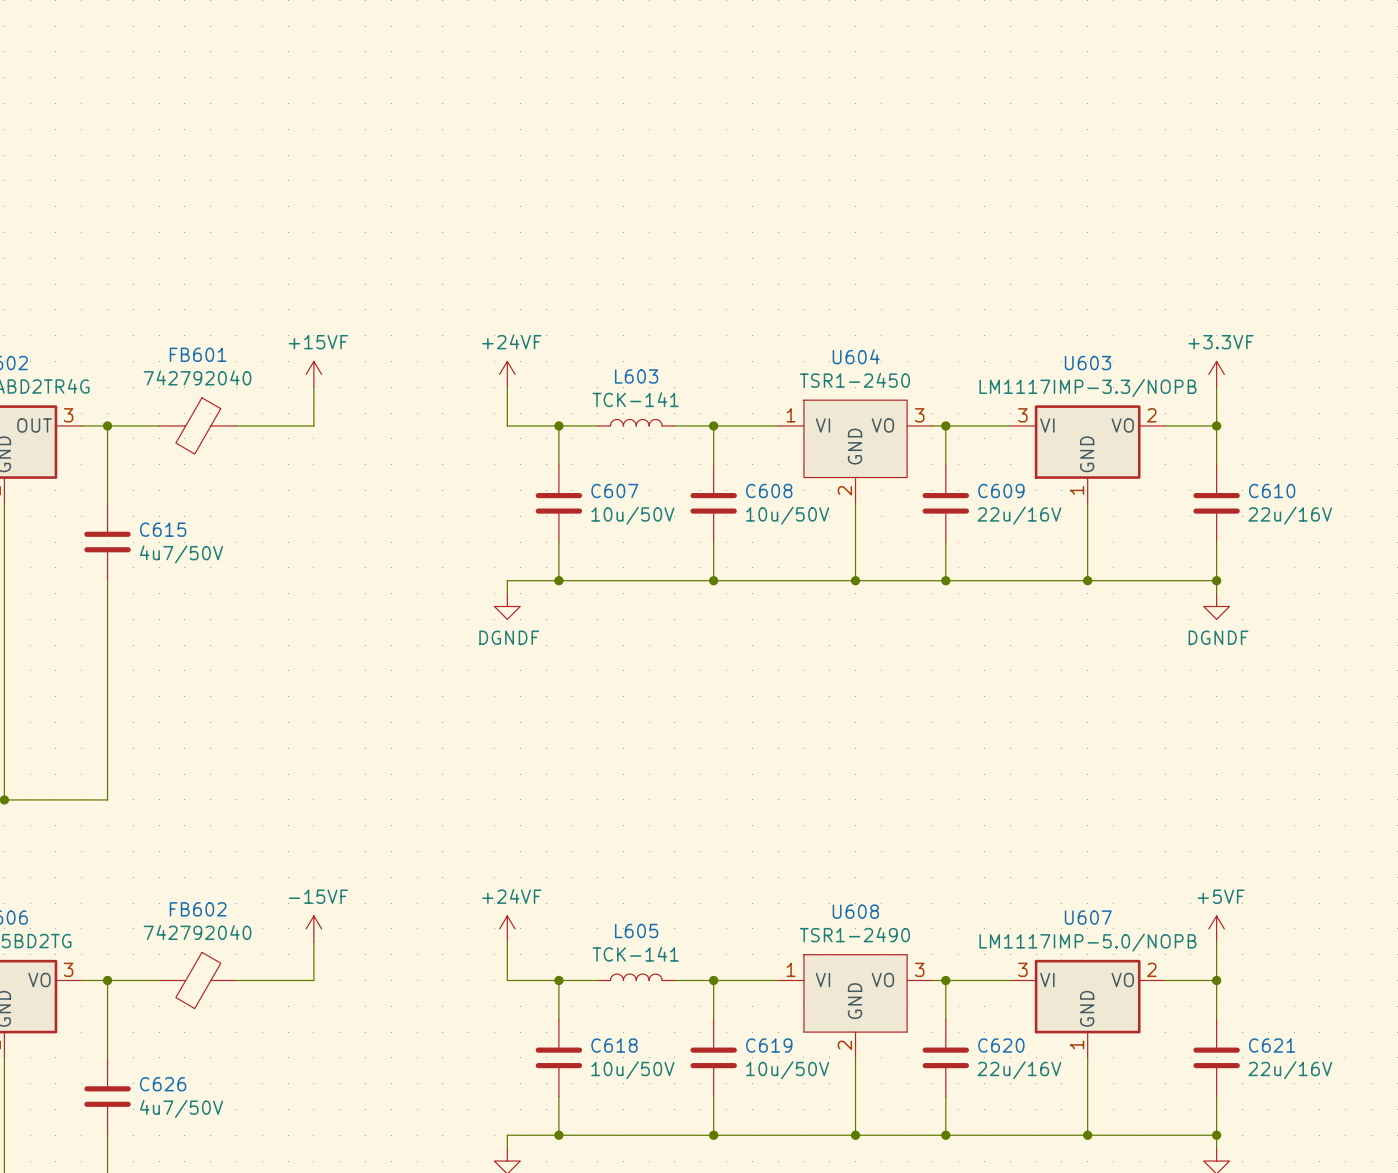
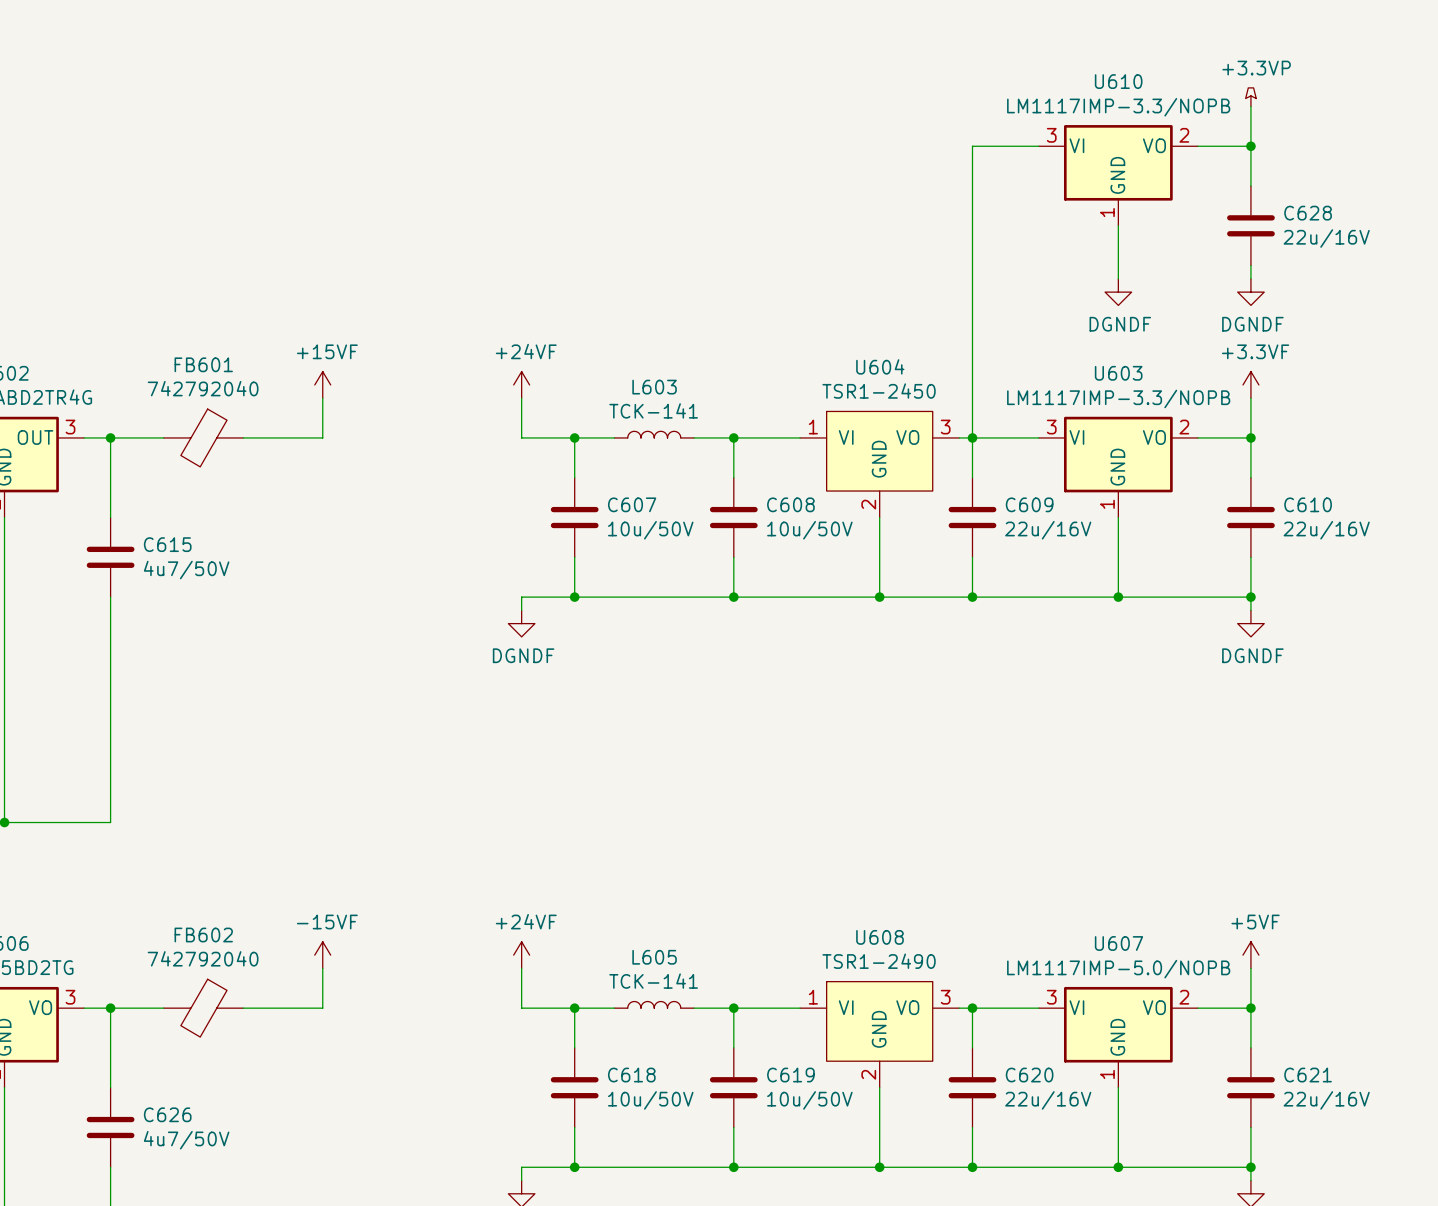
power symbol: none -> +3.3VP (1250, 97)
wire: none -> (1250, 106) (1250, 186)
wire: none -> (1038, 146) (972, 146) (972, 437)
wire: none -> (1197, 146) (1250, 146)
junction: none -> (1250, 146)
U610: none -> LM1117IMP-3.3/NOPB (1118, 175)
wire: none -> (1118, 225) (1118, 278)
C628: none -> 22u/16V (1250, 225)
wire: none -> (1250, 265) (1250, 278)
power symbol: none -> DGNDF (1118, 292)
power symbol: none -> DGNDF (1250, 292)

